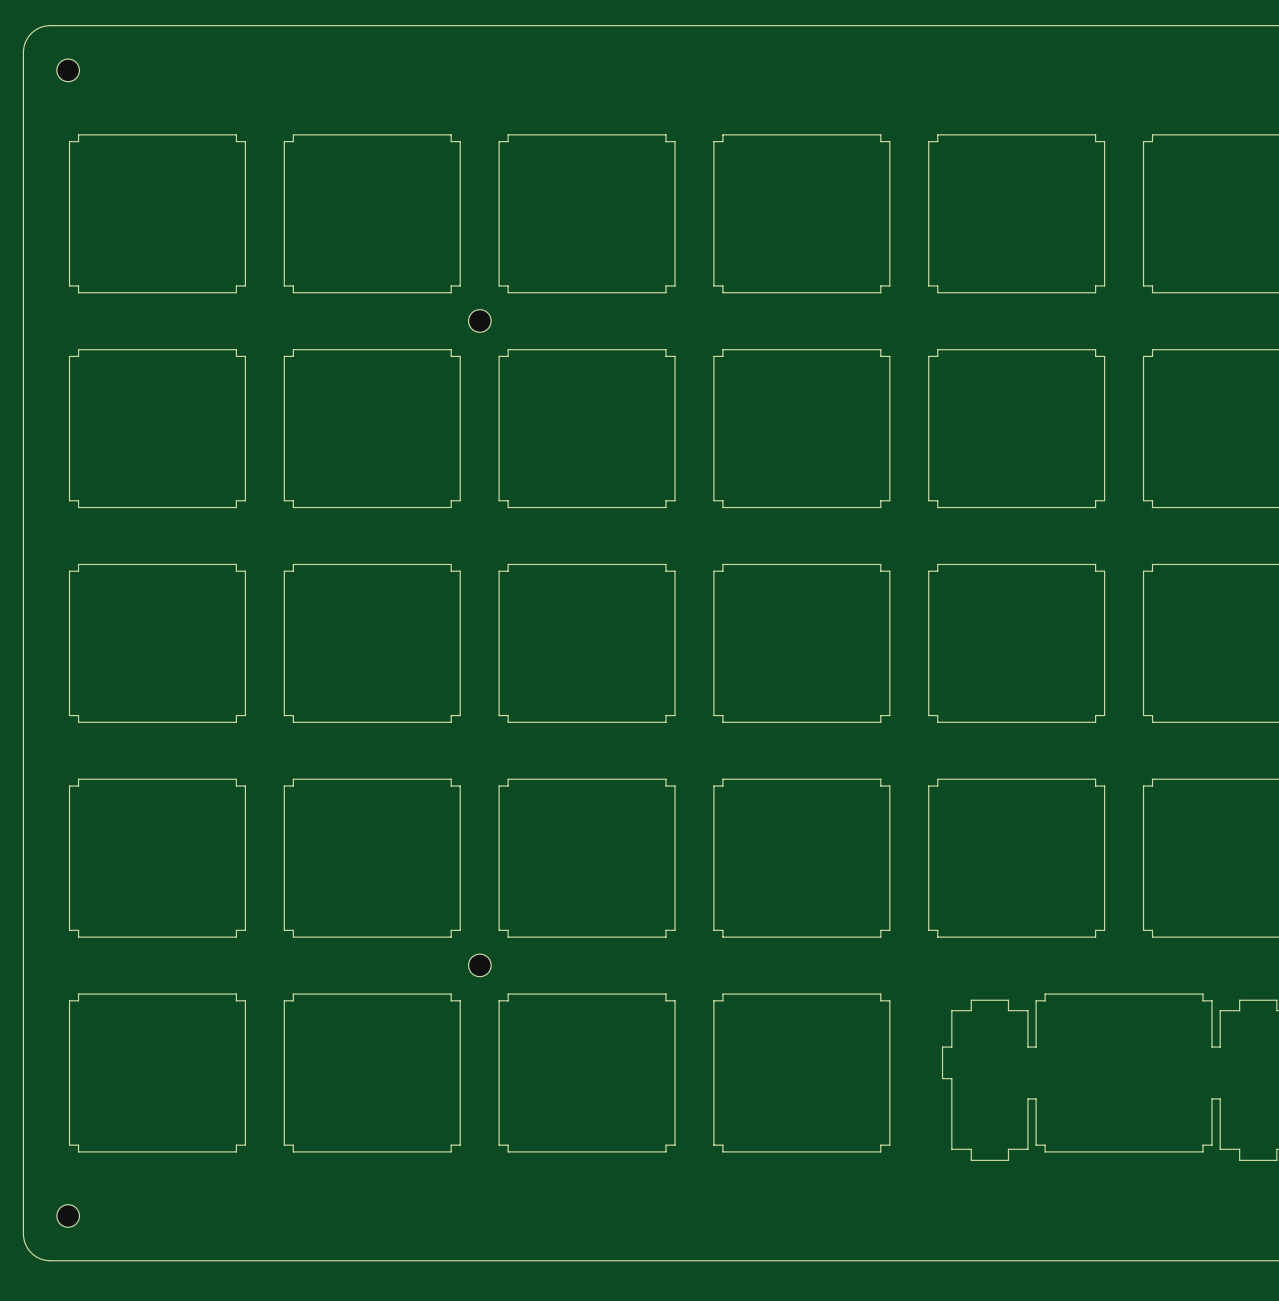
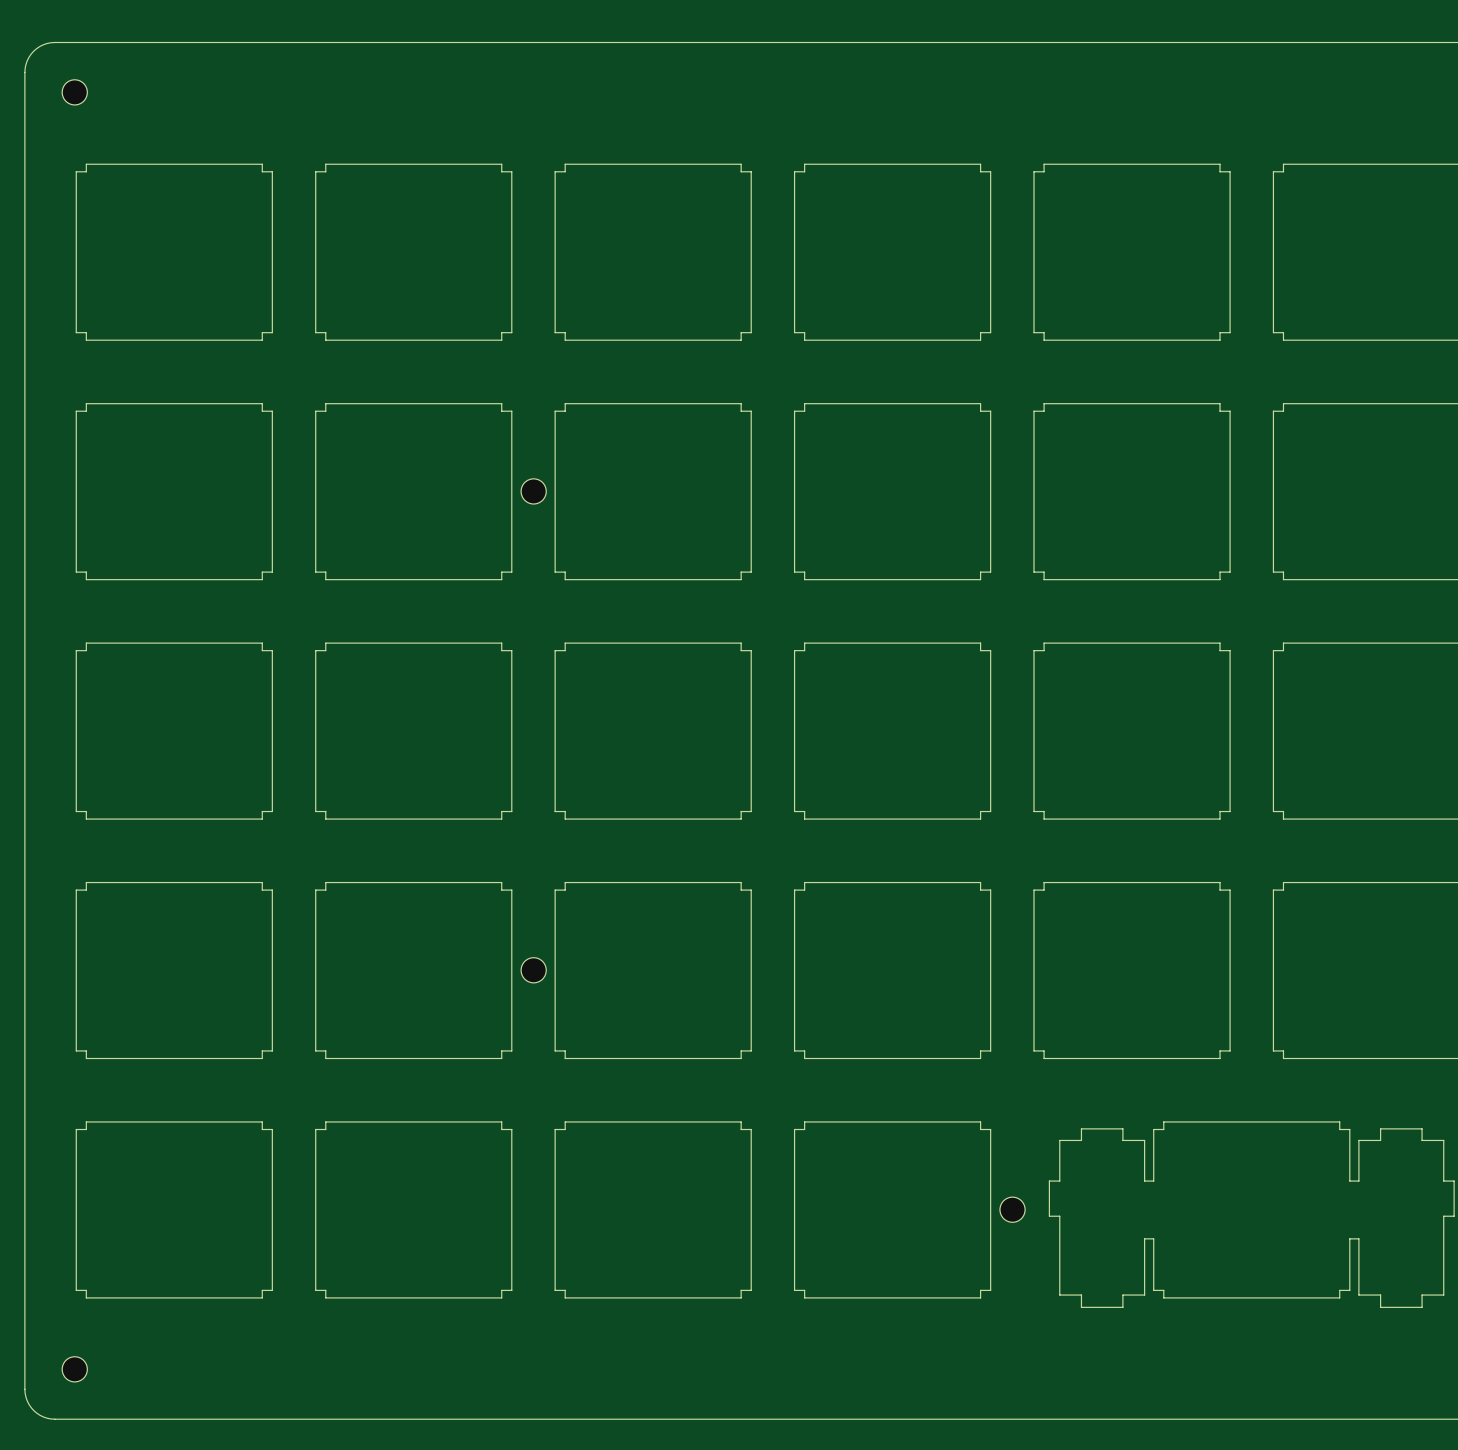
part position: (479, 320) -> (533, 491)
part position: (479, 965) -> (533, 970)
part: none -> (1012, 1209)

